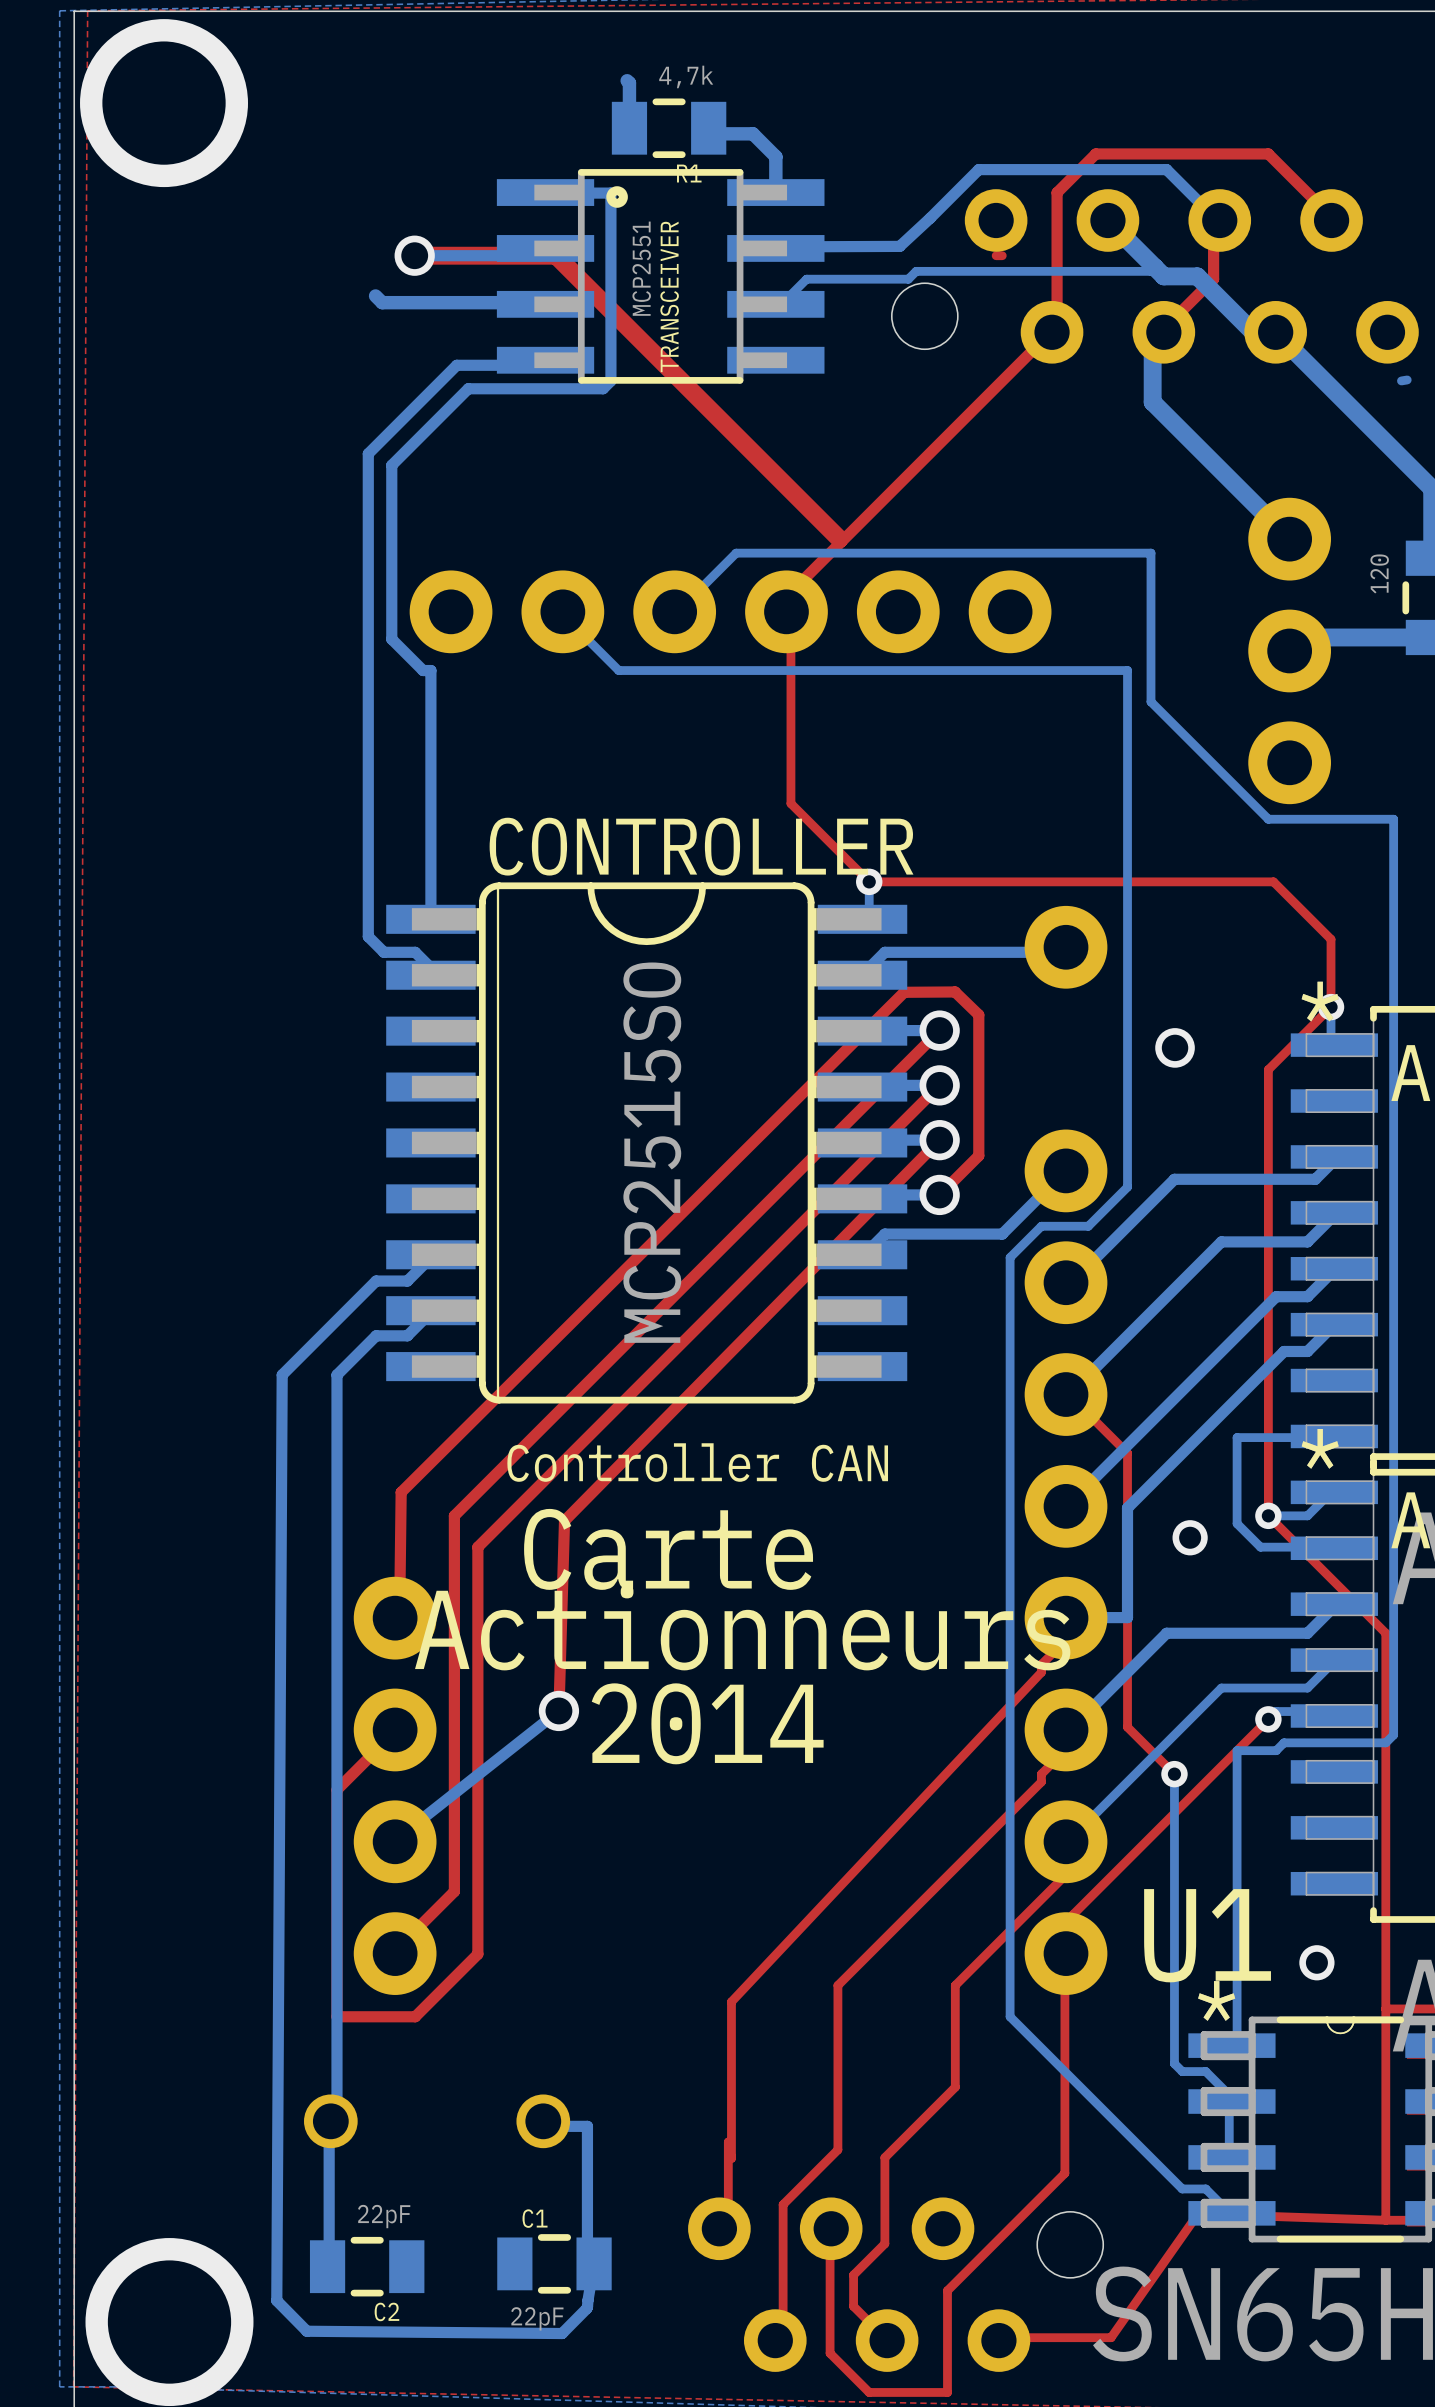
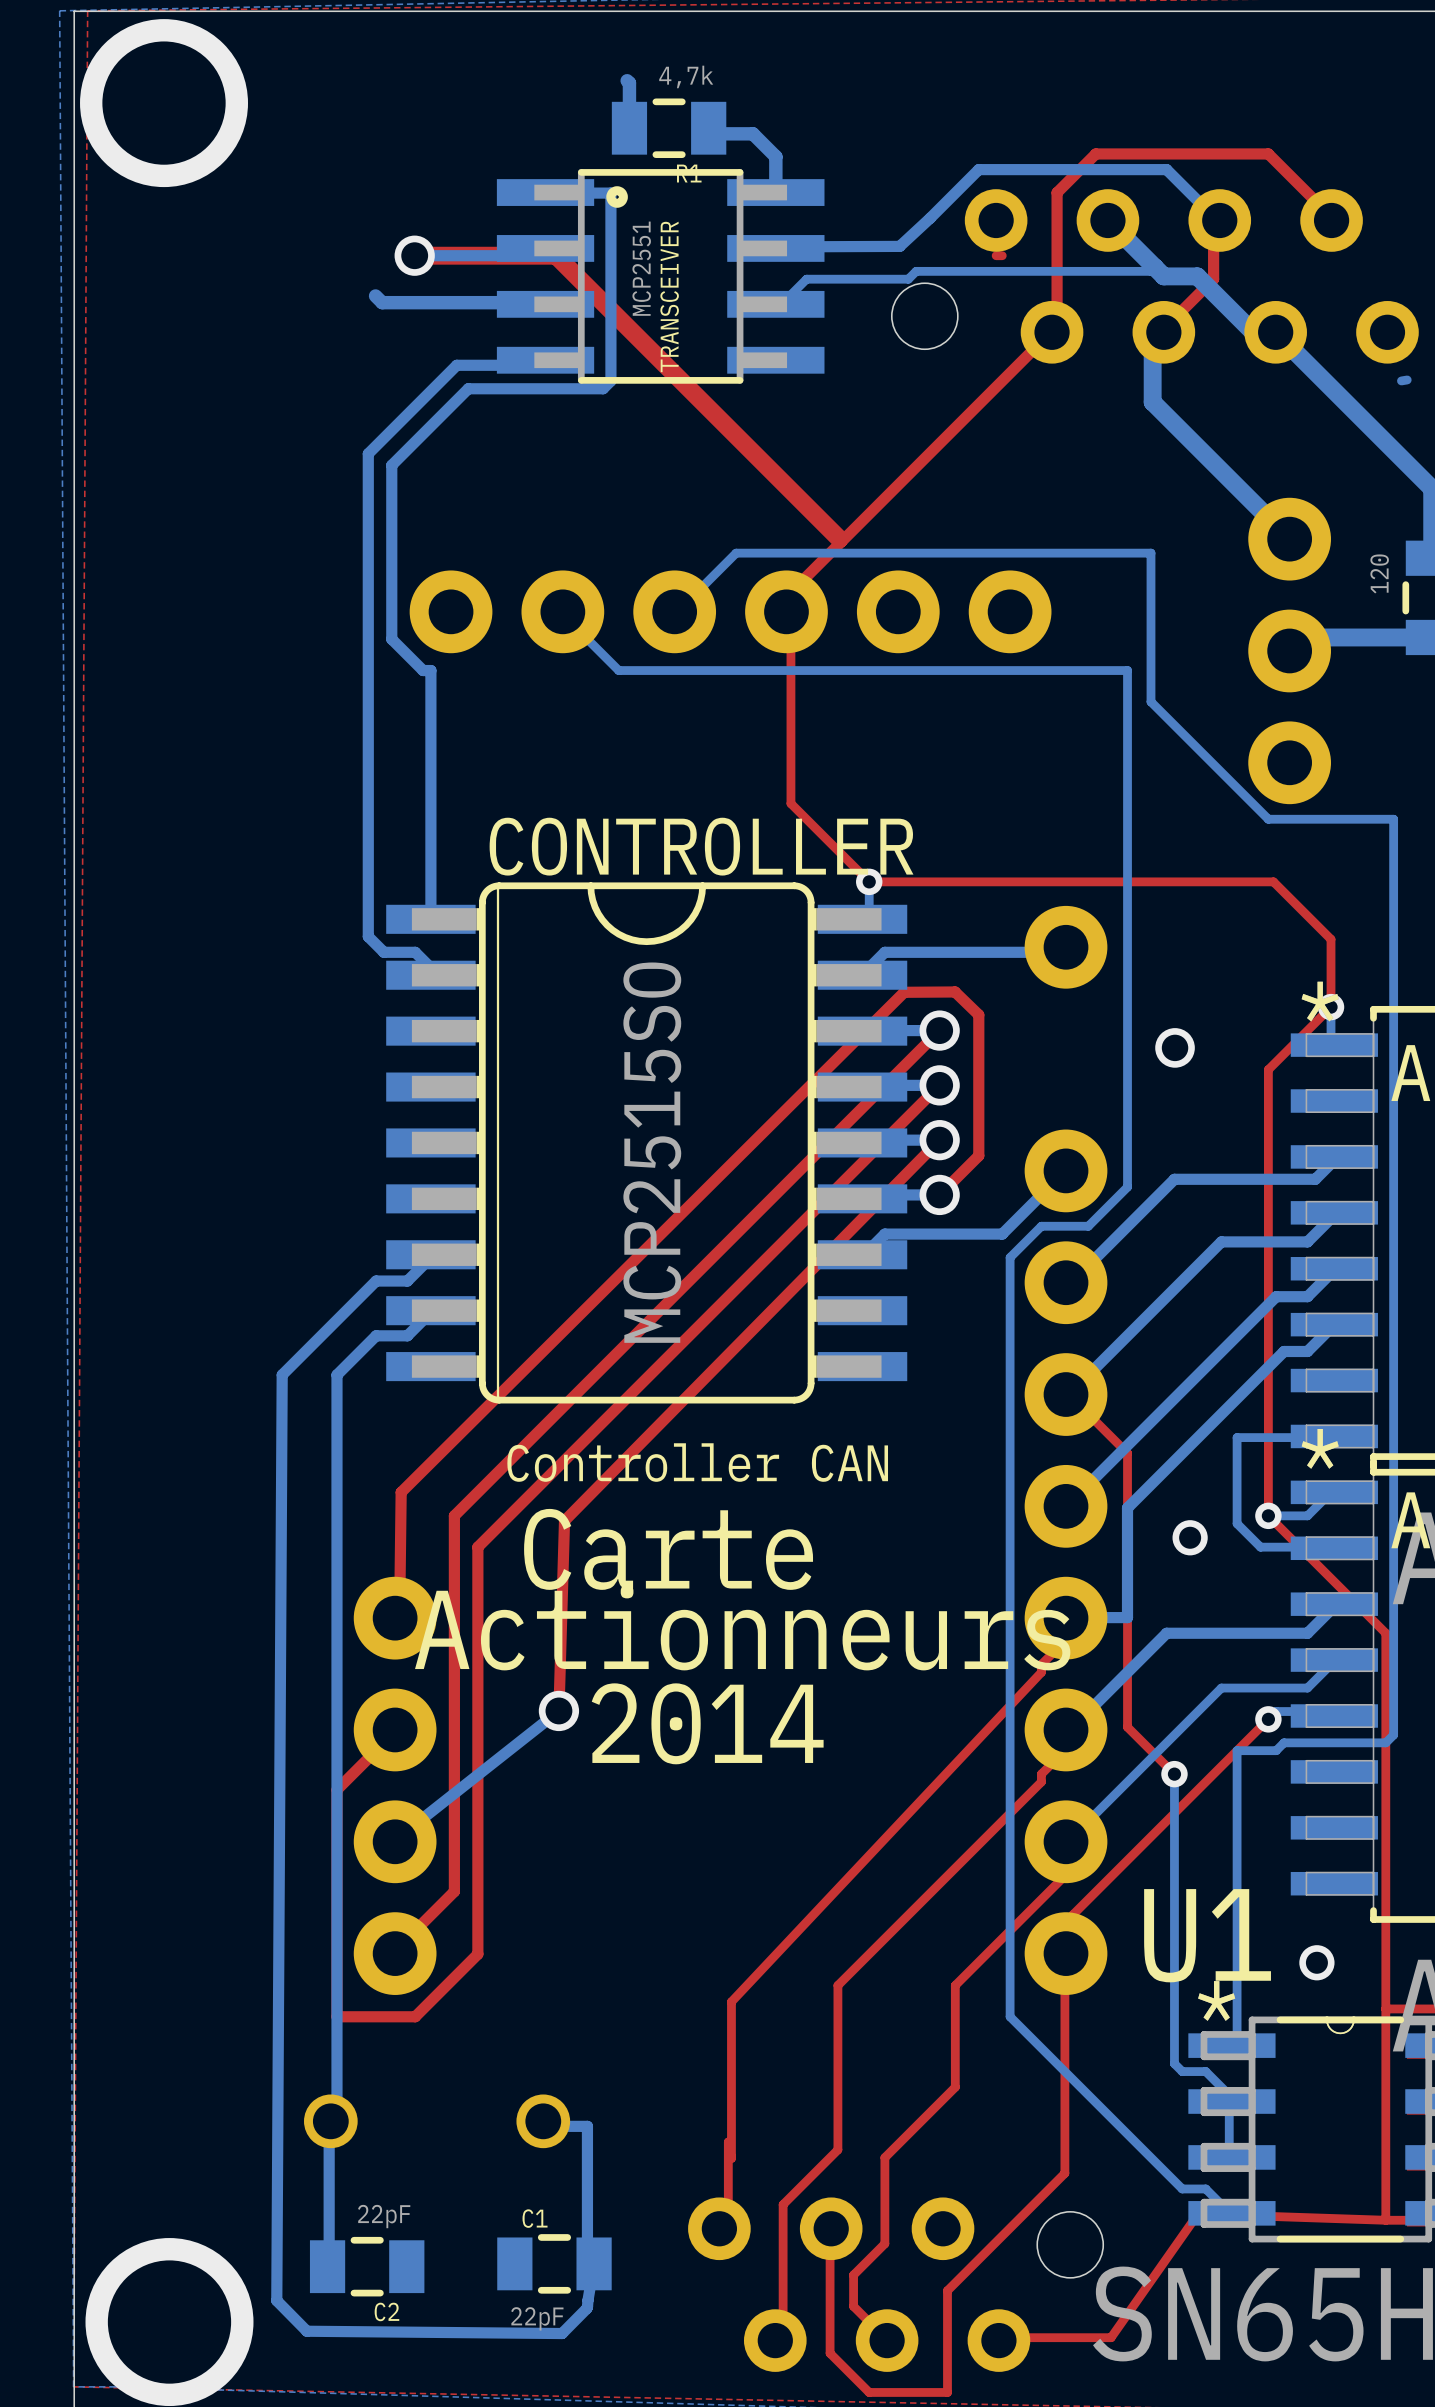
bottom zone outline: (59, 10) (59, 2386) (73, 2386) -> (59, 10) (73, 2386)

